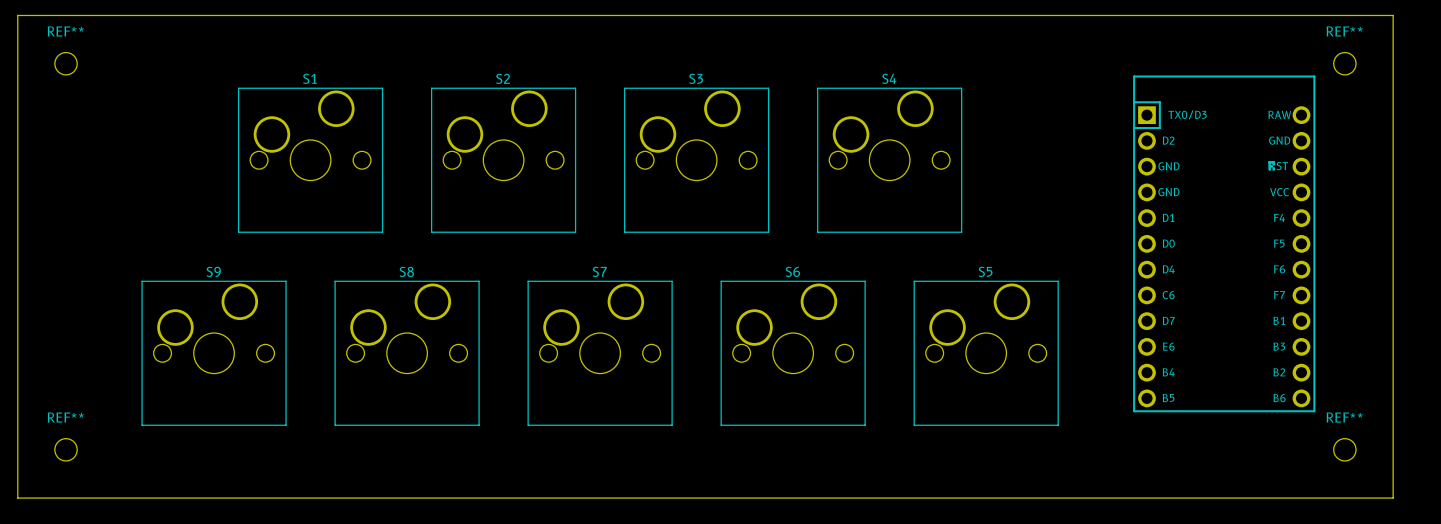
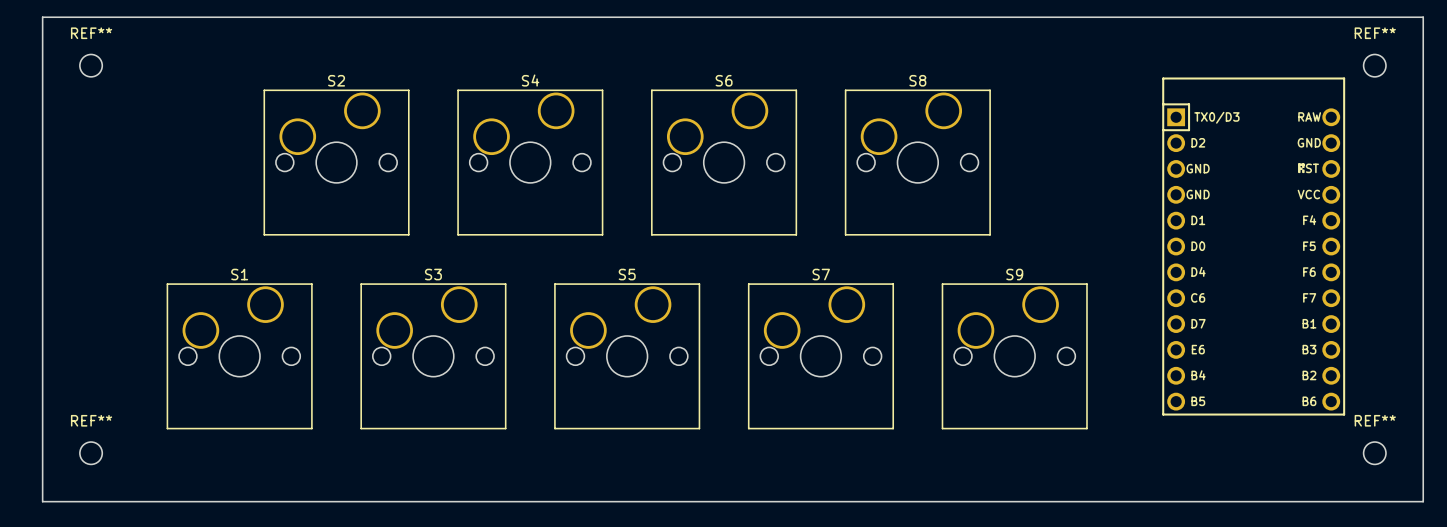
S1 name: S1 (310, 78) -> S2 (336, 80)
S2 name: S2 (503, 78) -> S4 (530, 80)
S3 name: S3 (696, 78) -> S6 (724, 80)
S4 name: S4 (889, 78) -> S8 (917, 80)
S9 name: S9 (213, 271) -> S1 (239, 274)
S8 name: S8 (406, 271) -> S3 (433, 274)
S7 name: S7 (599, 271) -> S5 (627, 274)
S6 name: S6 (792, 271) -> S7 (821, 274)
S5 name: S5 (985, 271) -> S9 (1014, 274)

